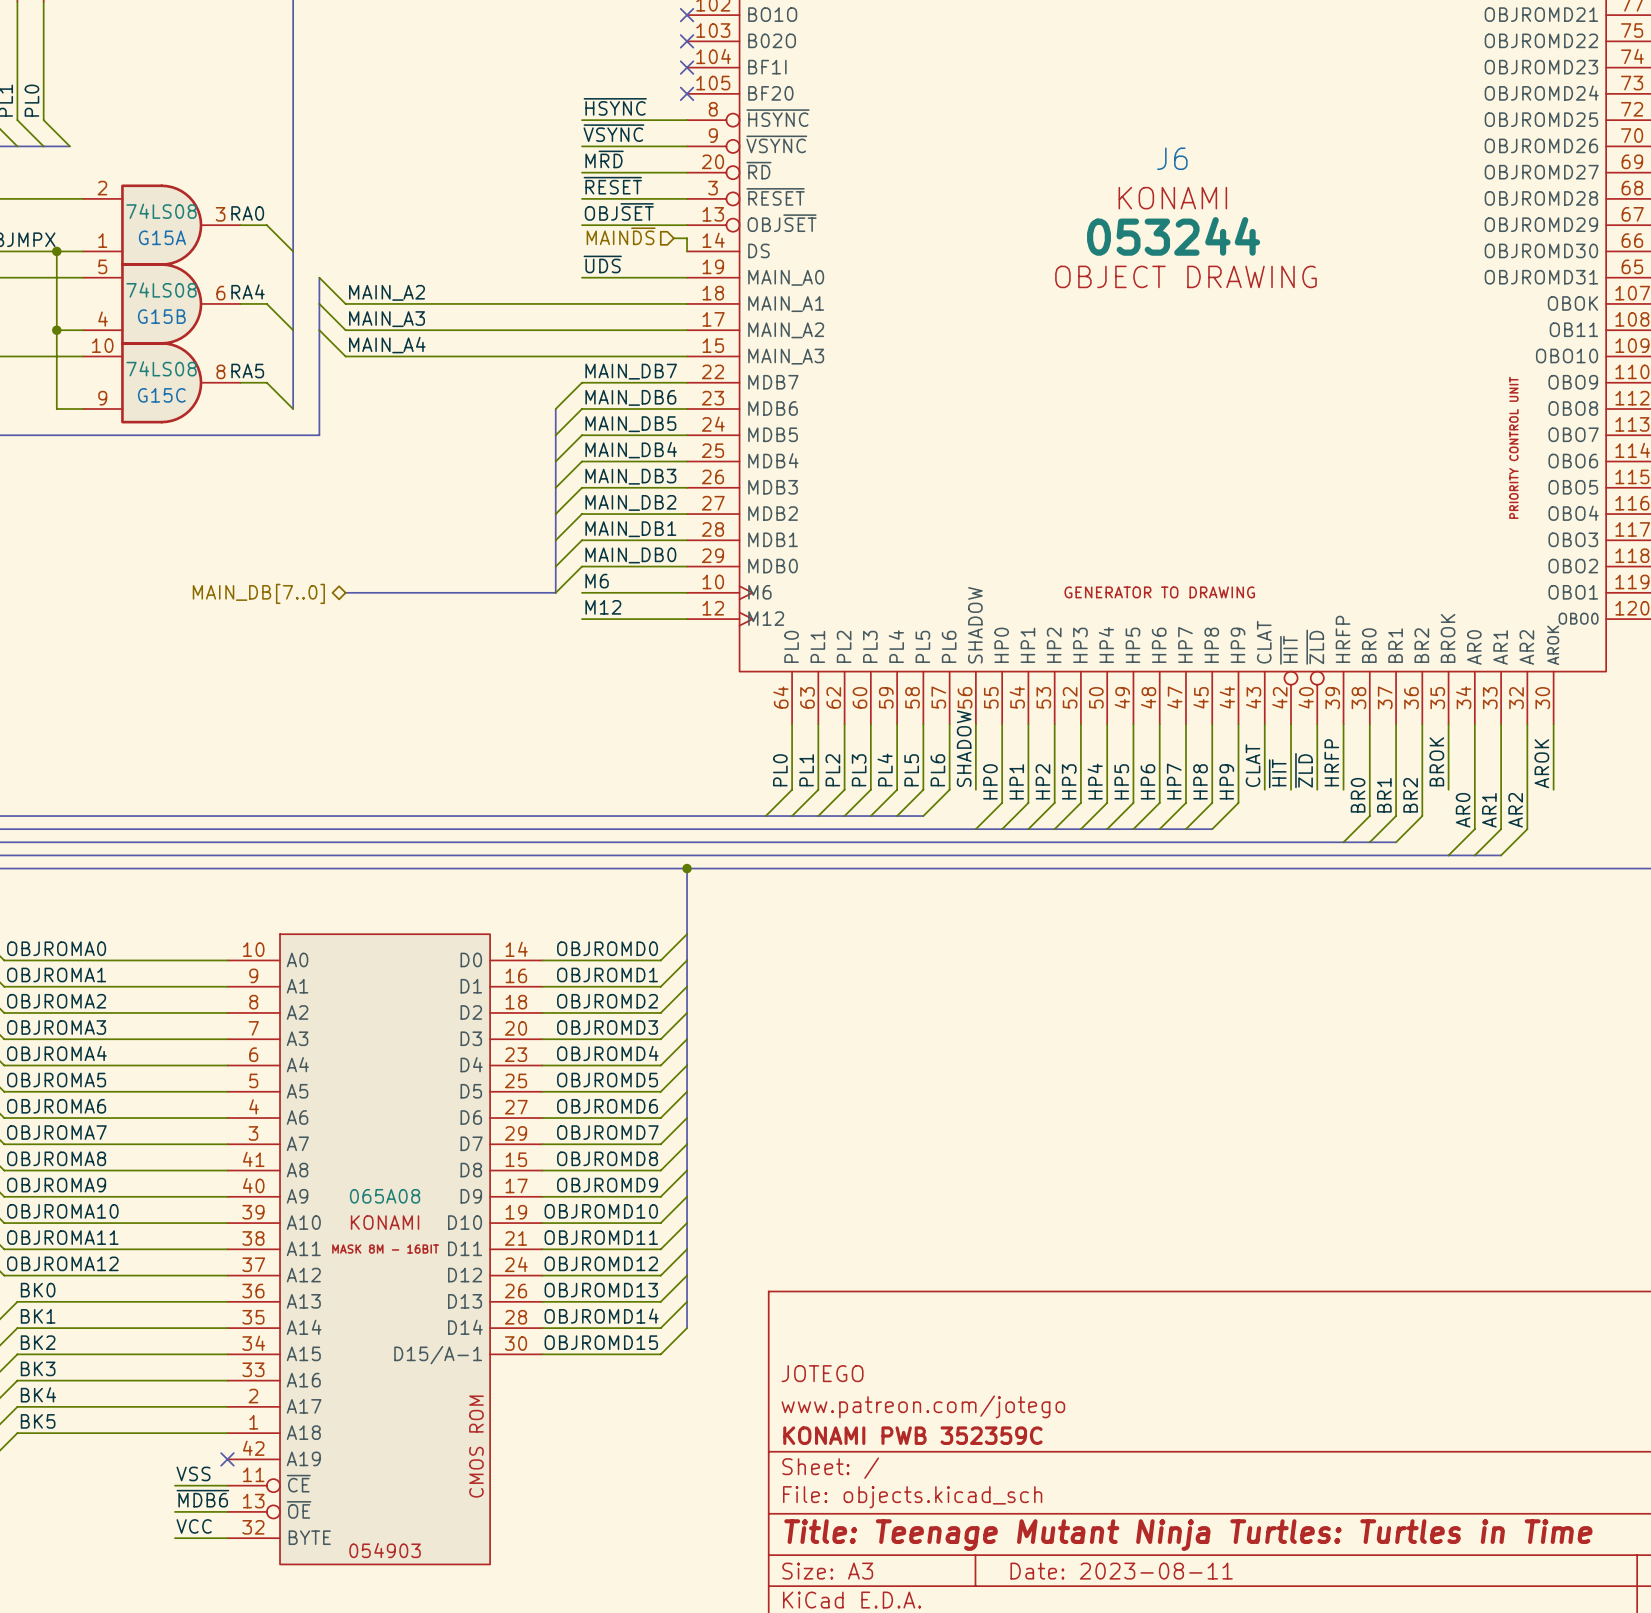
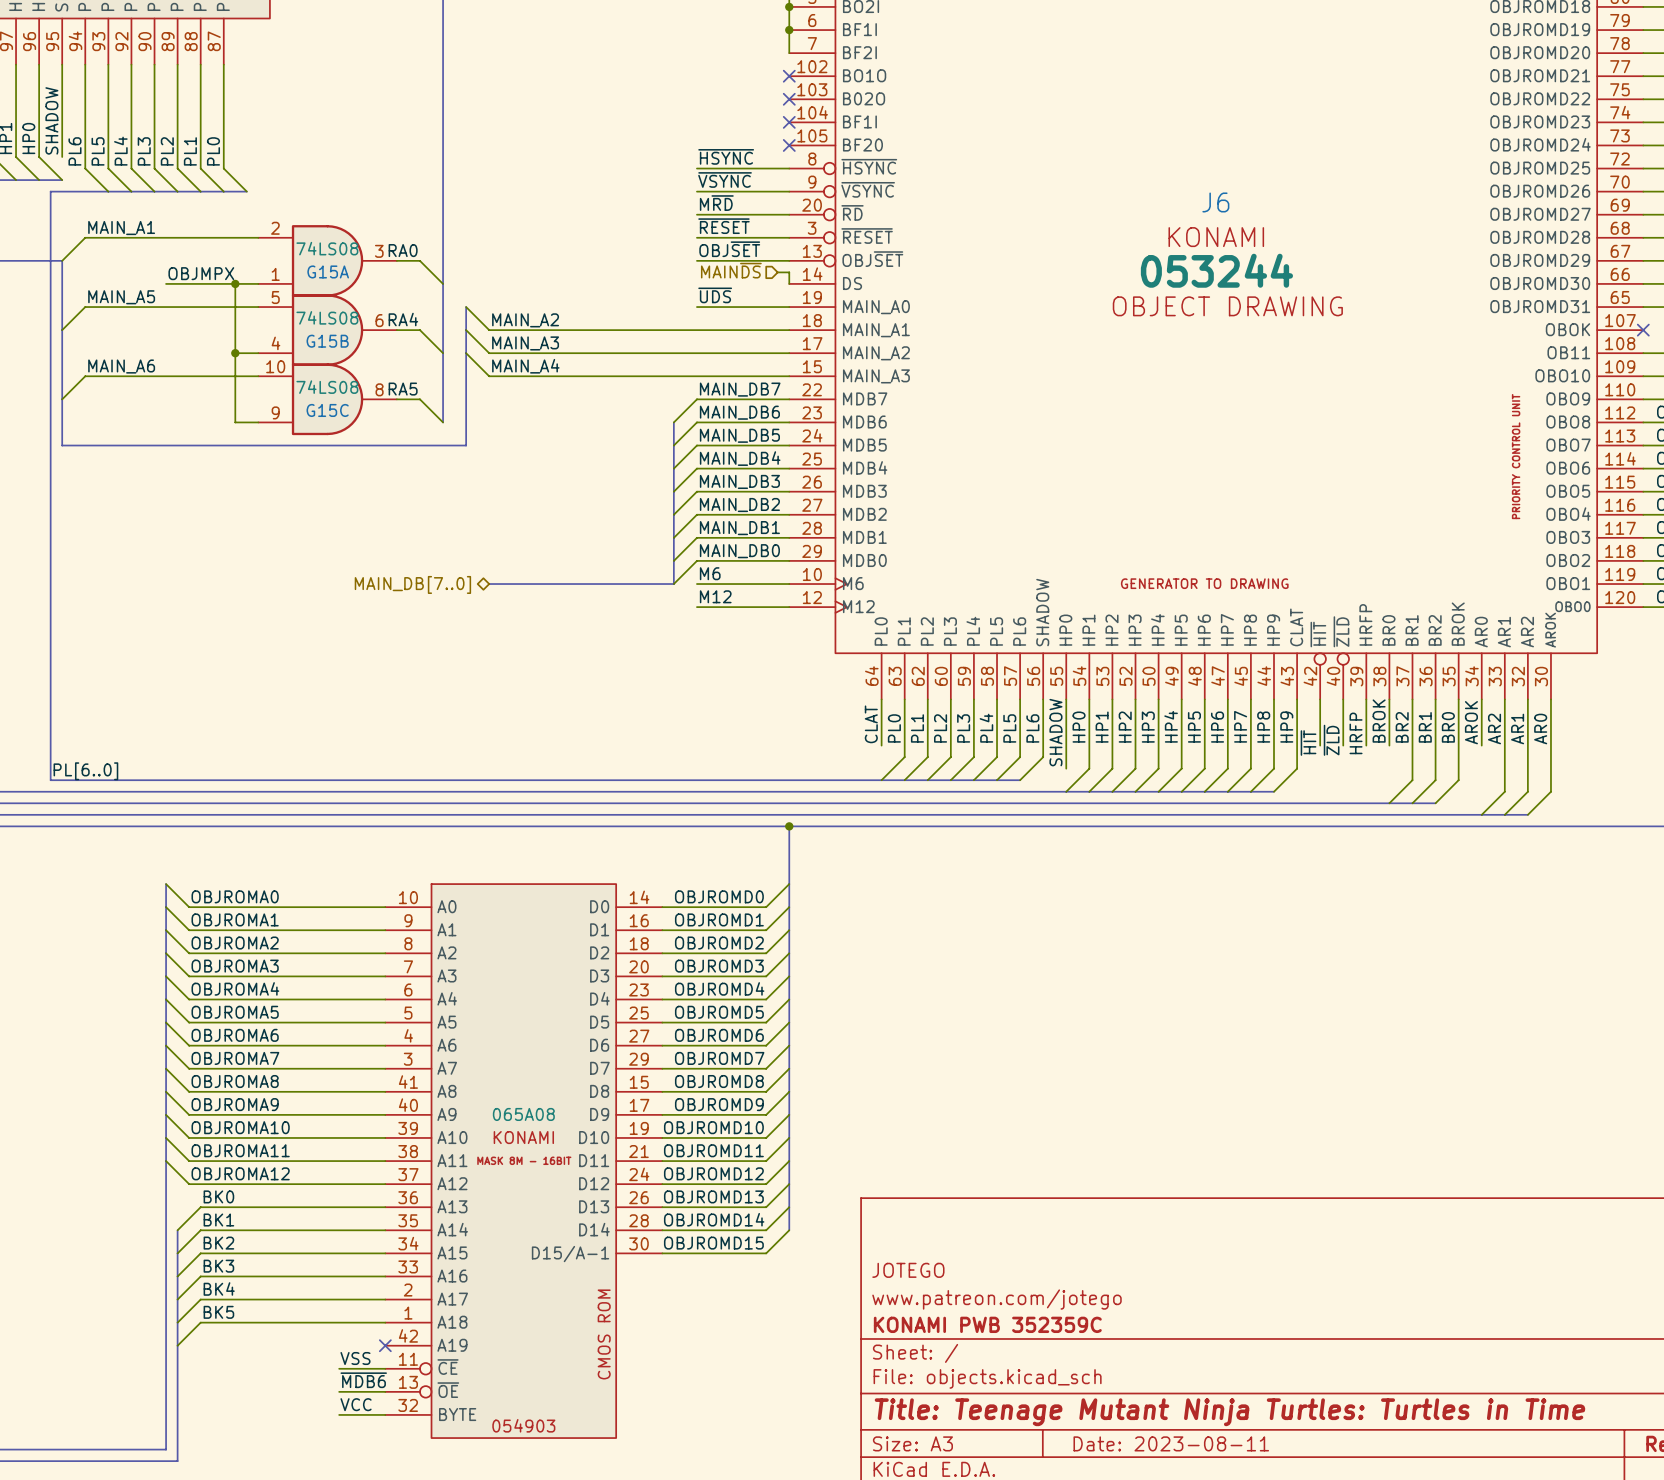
label: SHADOW (964, 748) -> none
label: none -> CLAT (871, 724)
label: none -> HP0 (1079, 727)
label position: BROK (1436, 761) -> BROK (1379, 721)
label position: AROK (1541, 763) -> AROK (1471, 722)
label: CLAT (1253, 765) -> none
label position: PL4 (885, 769) -> PL4 (986, 728)
label position: PL0 (780, 770) -> PL0 (894, 728)
label position: PL1 (806, 770) -> PL1 (917, 728)
label position: PL2 (832, 770) -> PL2 (940, 728)
label position: PL3 (859, 770) -> PL3 (963, 728)
label position: PL5 (911, 770) -> PL5 (1009, 728)
label position: PL6 (937, 770) -> PL6 (1032, 728)
wire: (792, 776) (792, 789) (765, 816) -> none
wire: (1291, 776) (1291, 789) -> none
wire: (1317, 776) (1317, 789) -> none
wire: (1343, 776) (1343, 789) -> none
wire: (1369, 776) (1369, 816) (1343, 842) -> (1550, 757) (1550, 791) (1527, 814)
wire: (1474, 776) (1474, 829) (1448, 855) -> none
label: HP0 (990, 781) -> SHADOW (1055, 732)
label position: HP1 (1016, 781) -> HP1 (1102, 727)
label position: HP2 (1042, 781) -> HP2 (1125, 727)
label position: HP3 (1069, 781) -> HP3 (1148, 727)
label position: HP4 (1095, 781) -> HP4 (1171, 726)
label position: HP5 (1121, 781) -> HP5 (1194, 727)
label position: HP6 (1148, 781) -> HP6 (1217, 727)
label position: HP7 (1174, 781) -> HP7 (1240, 726)
label position: HP8 (1200, 781) -> HP8 (1263, 727)
label position: HP9 (1226, 781) -> HP9 (1286, 727)
wire: none -> (1297, 757) (1297, 768) (1274, 791)
wire: none -> (1458, 757) (1458, 780) (1435, 803)
label position: BR0 (1358, 795) -> BR0 (1448, 727)
label position: BR1 (1384, 795) -> BR1 (1425, 727)
label position: BR2 (1410, 795) -> BR2 (1402, 727)
wire: (1002, 802) (975, 829) -> (1043, 757) (1020, 780)
label position: AR0 (1463, 810) -> AR0 (1540, 729)
label position: AR1 (1489, 810) -> AR1 (1517, 729)
label position: AR2 (1515, 810) -> AR2 (1494, 729)
bus: none -> (997, 780) (1020, 780)
bus: none -> (1250, 791) (1274, 791)
bus: none -> (1412, 803) (1435, 803)
bus: none -> (1504, 814) (1527, 814)

